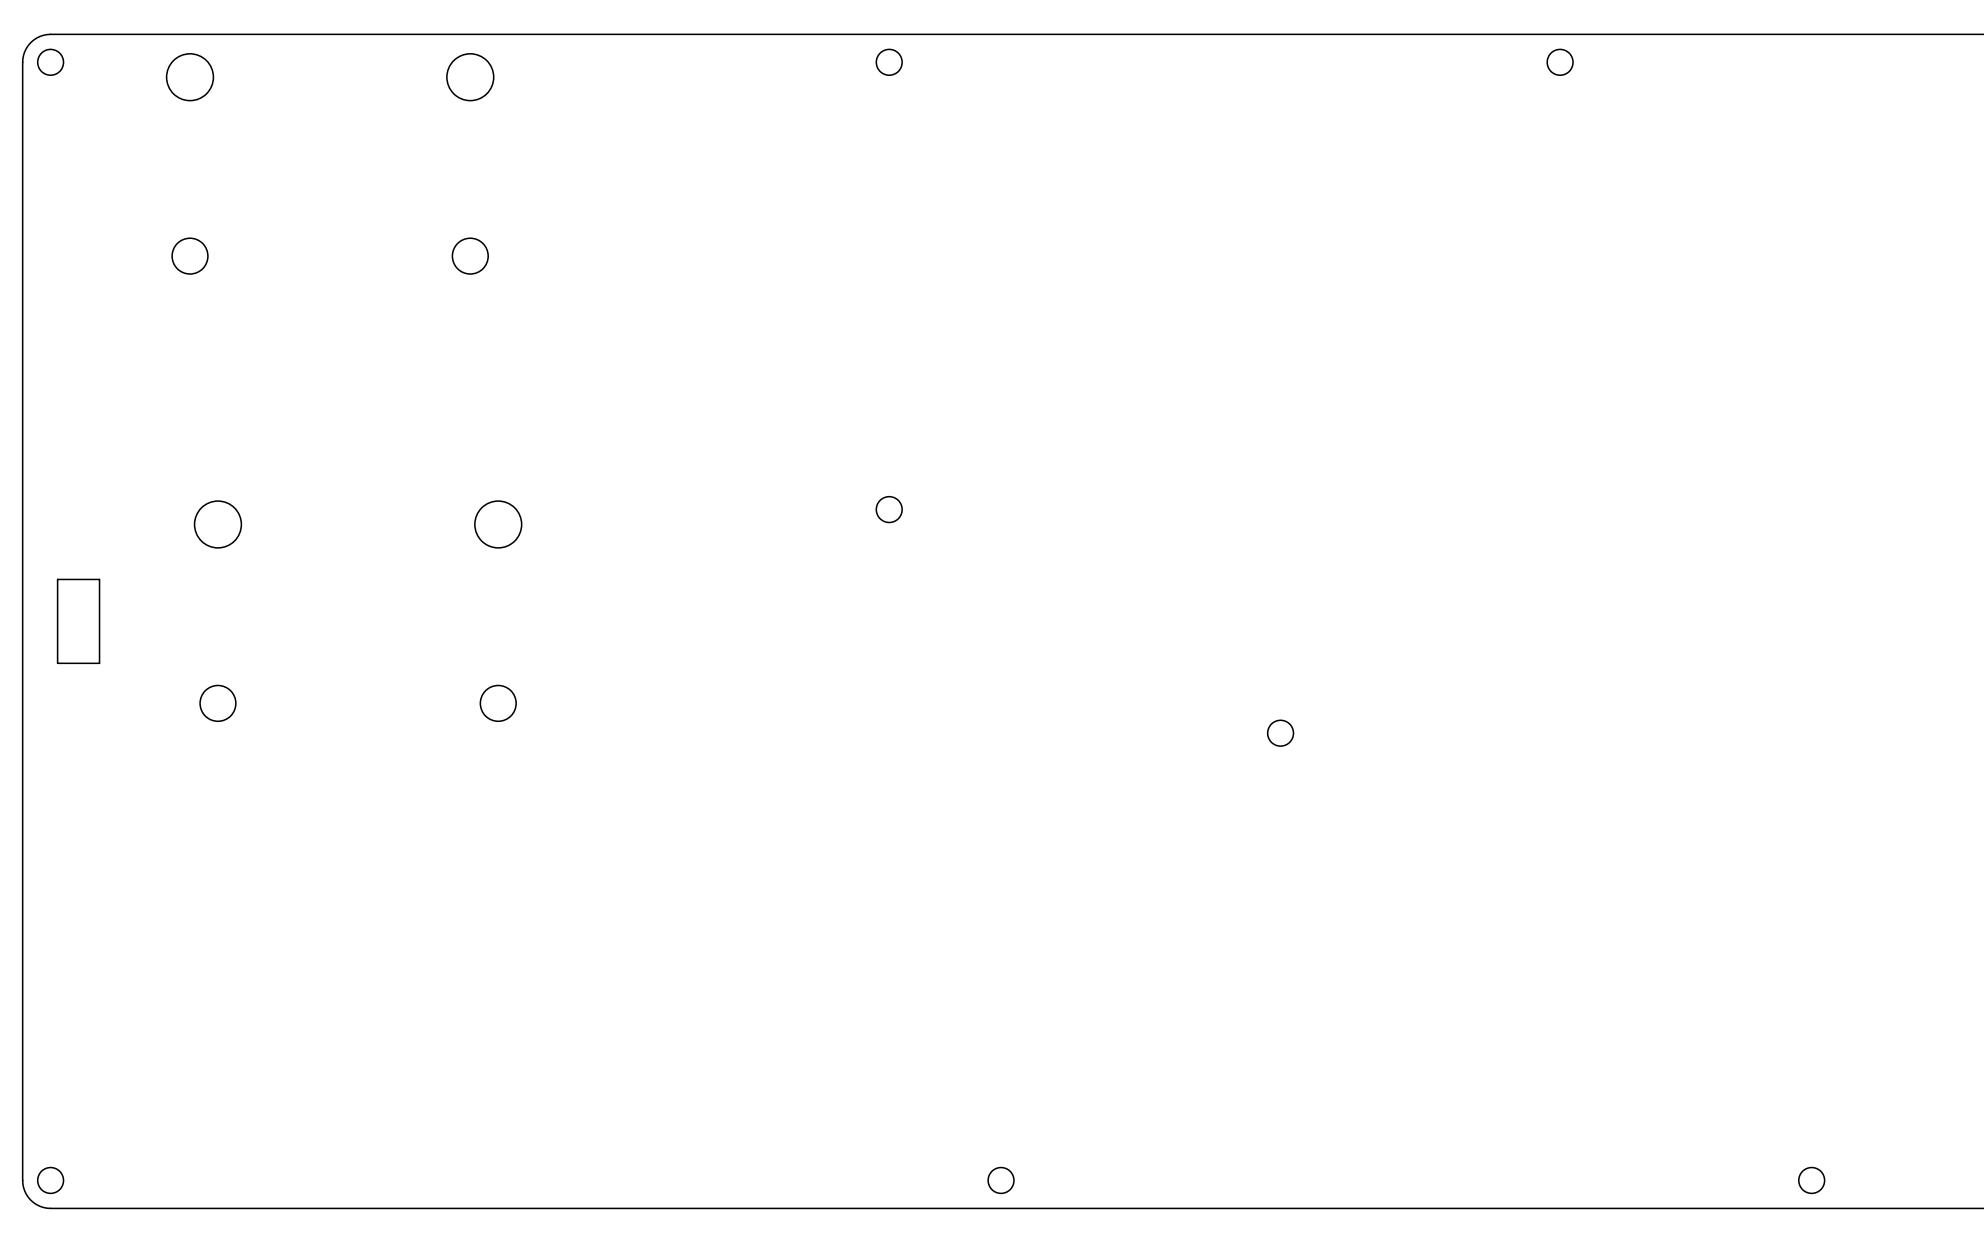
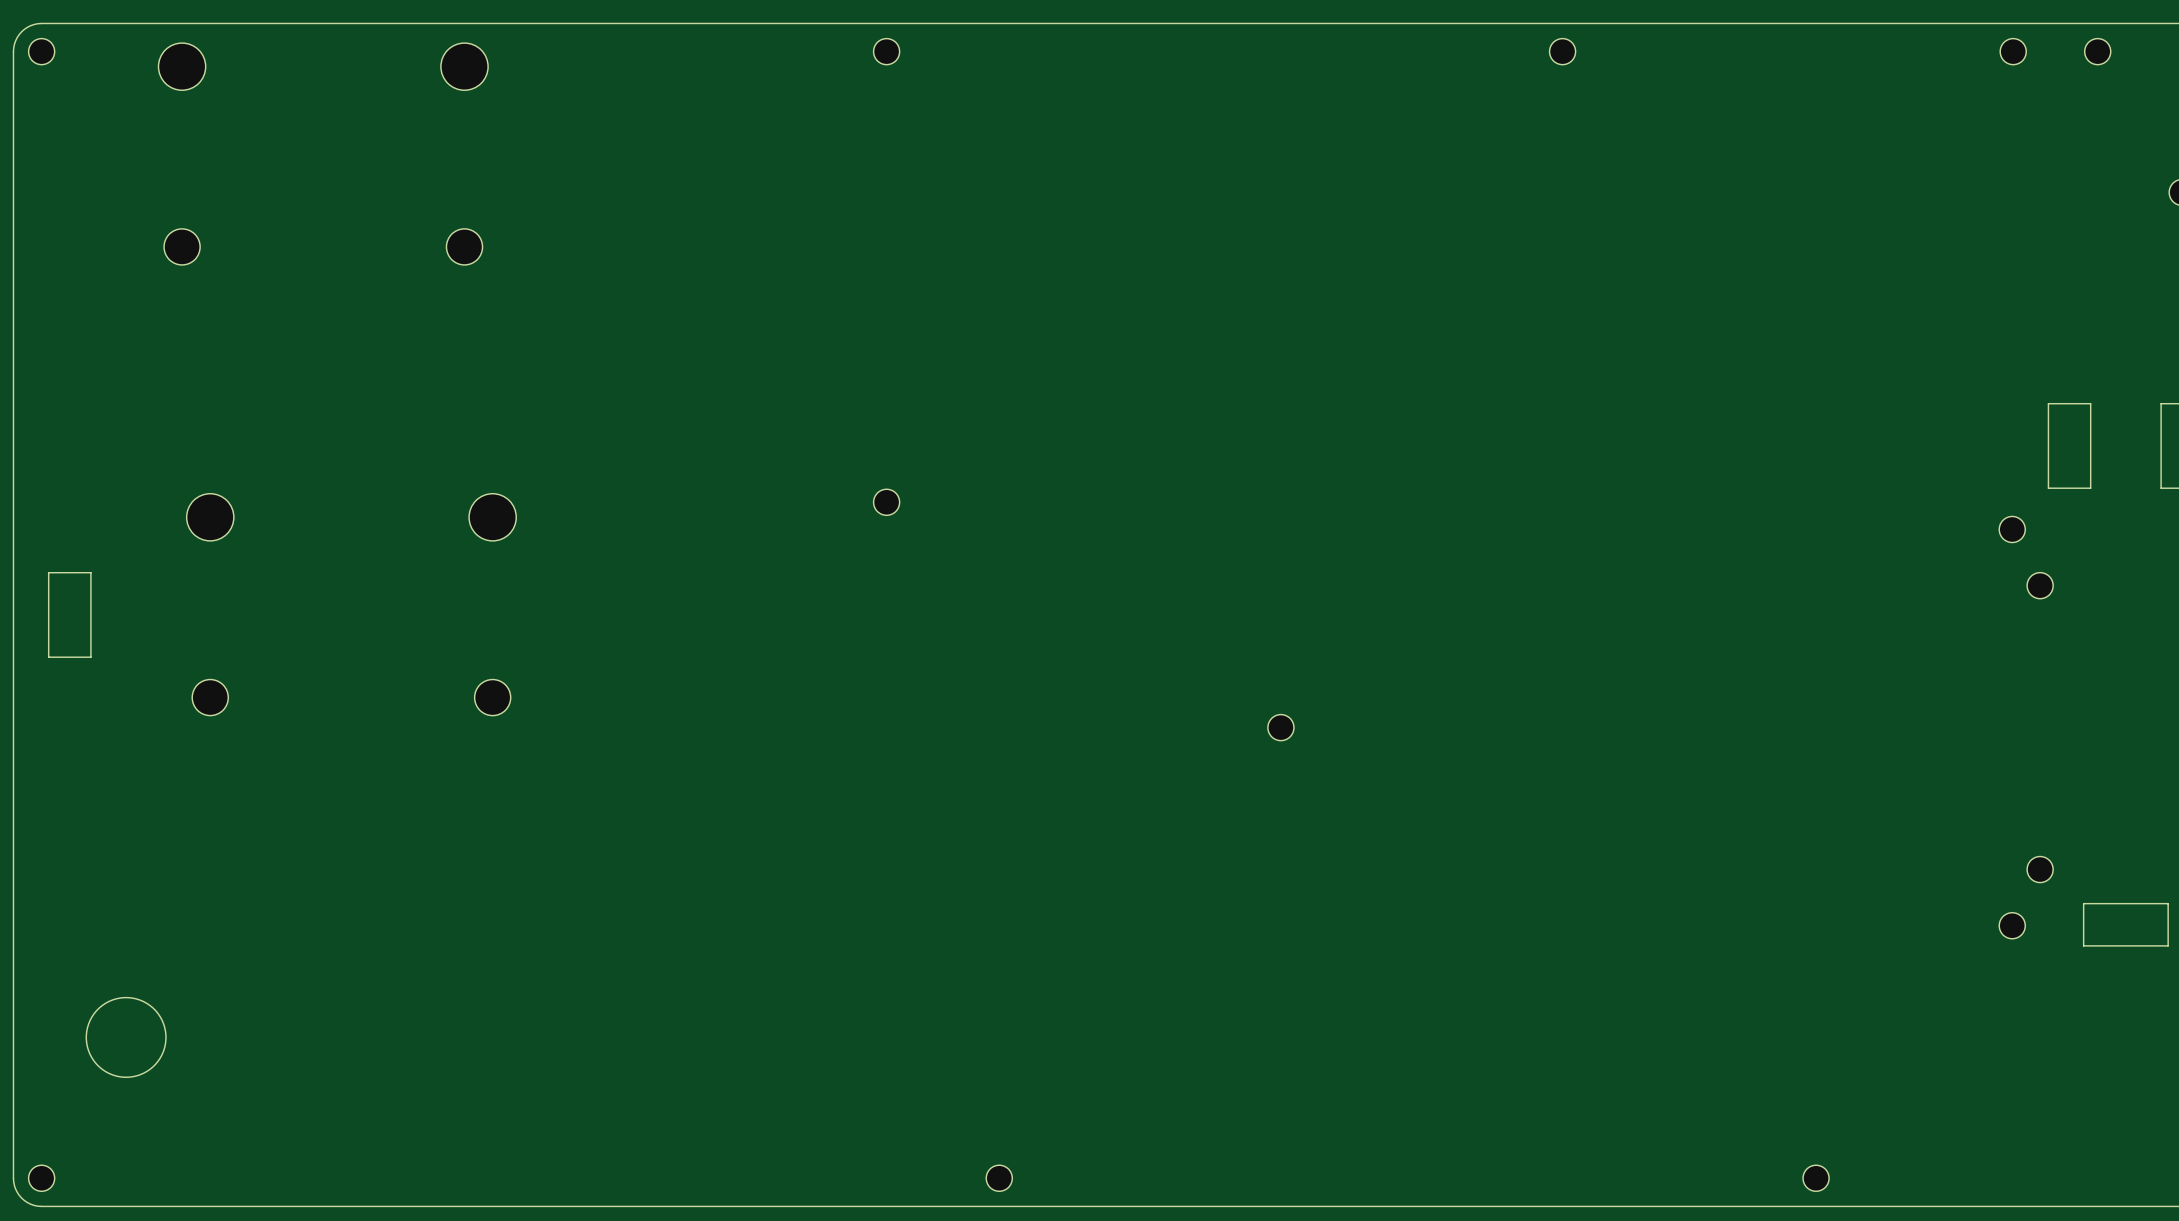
round board edge: none -> [86, 997, 167, 1078]

